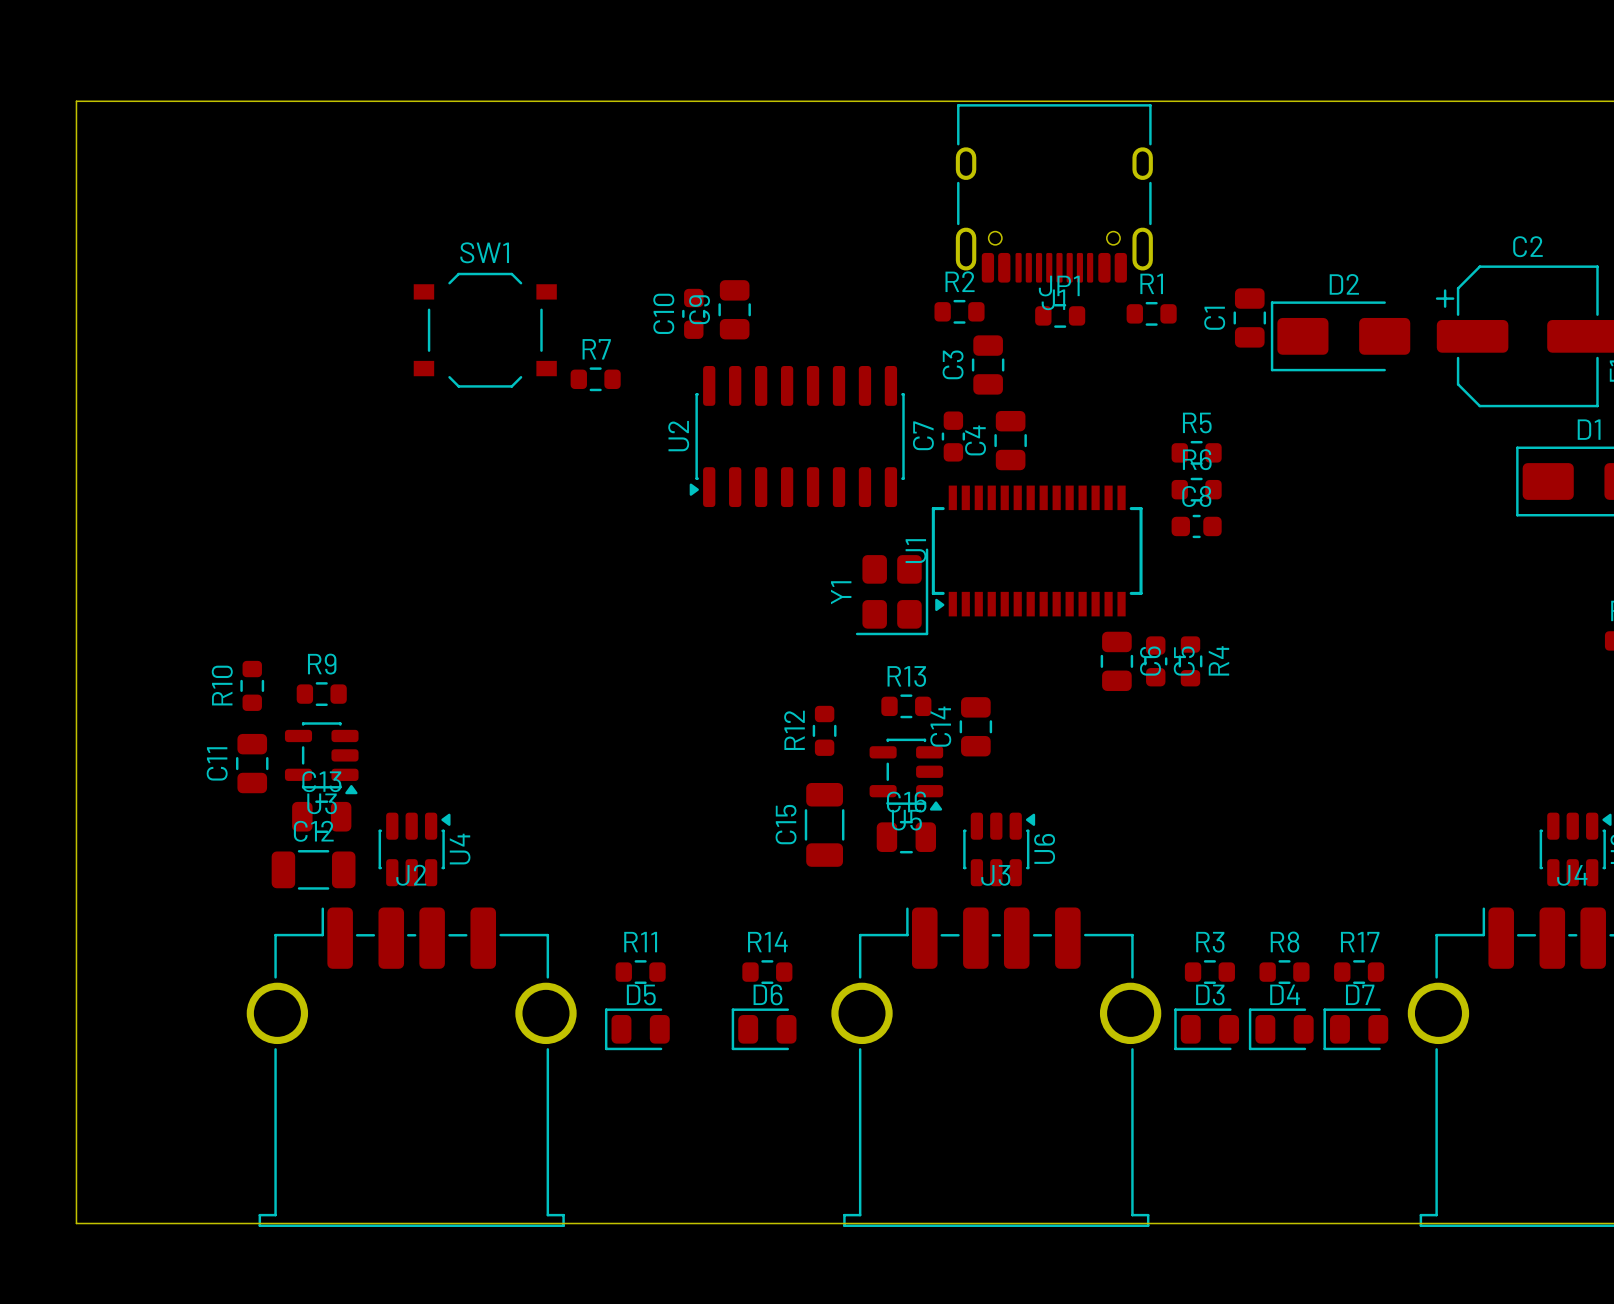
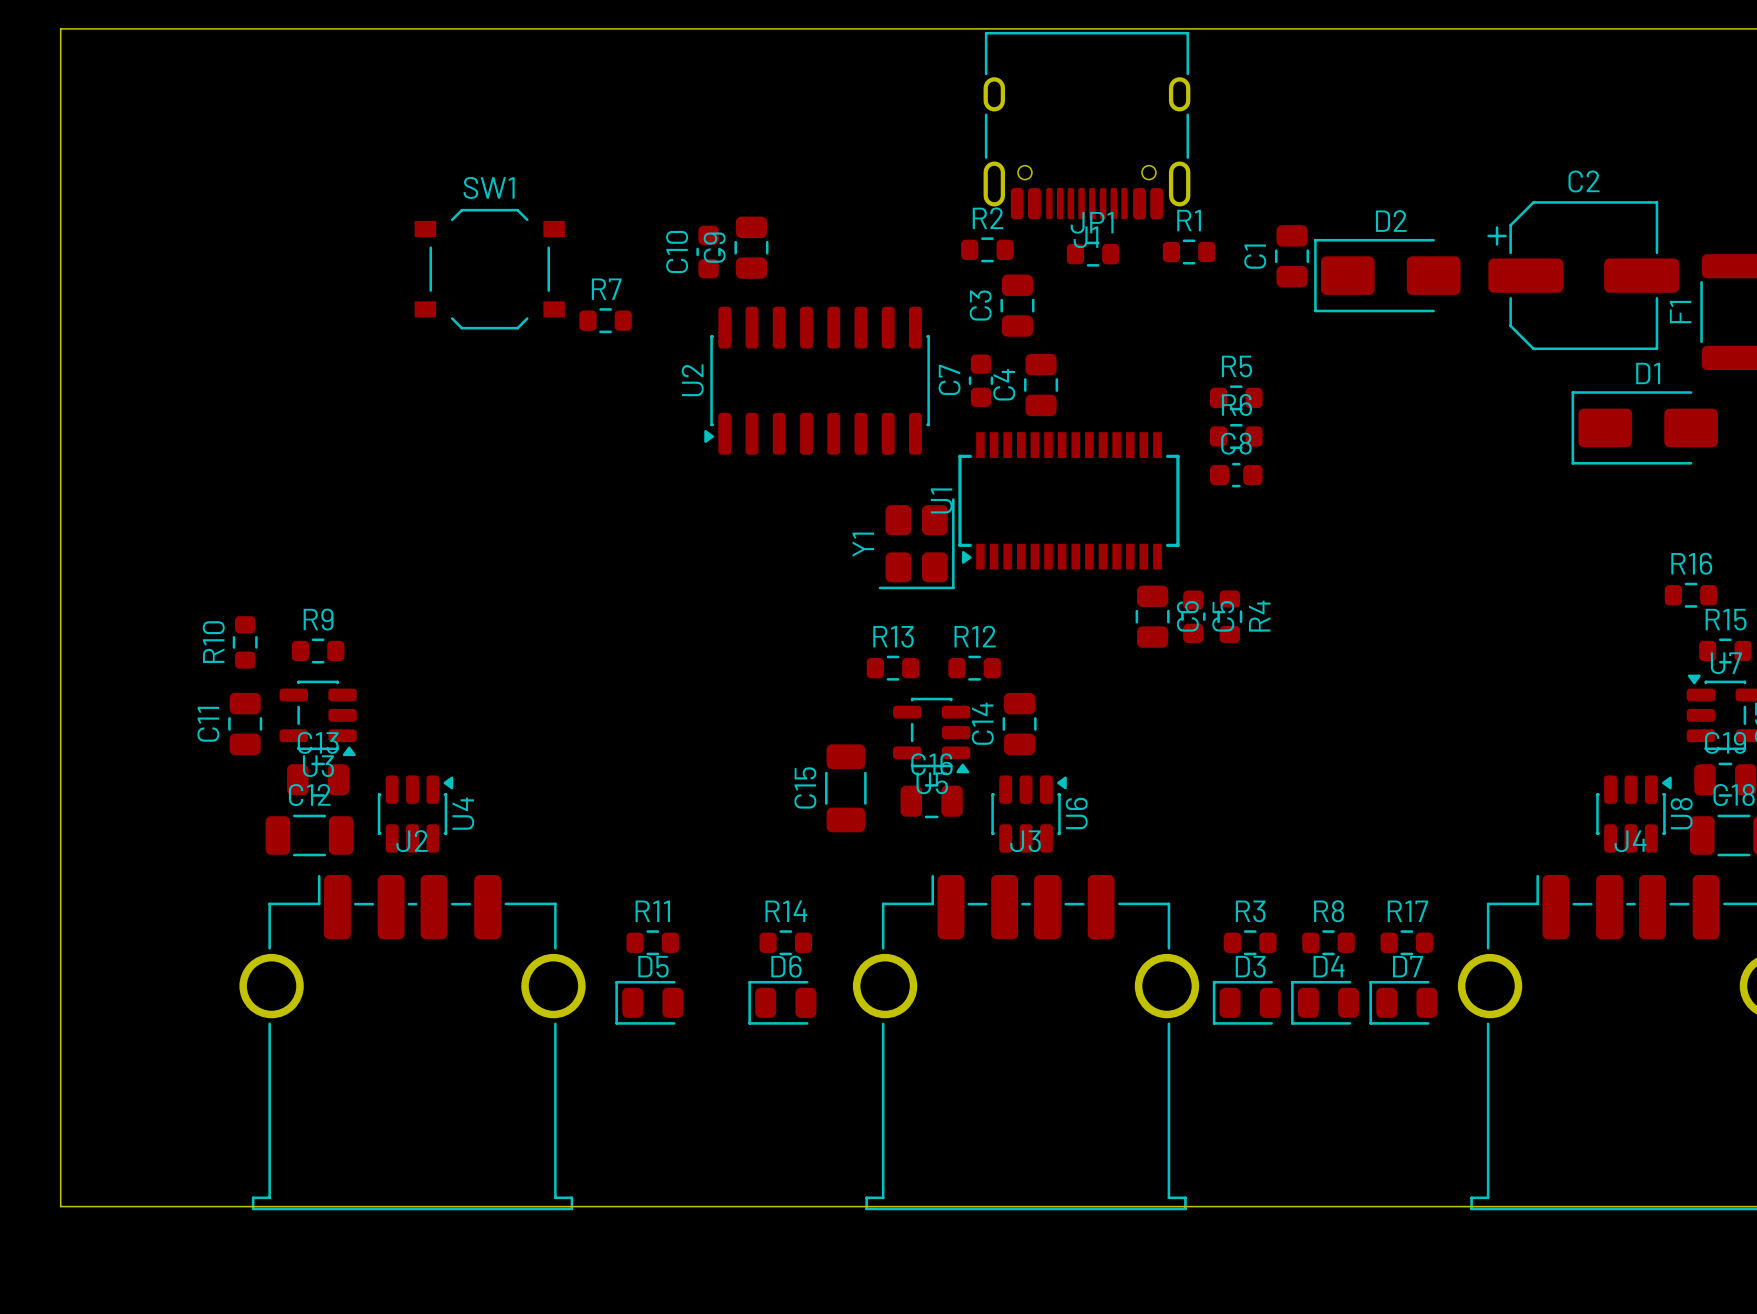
R13 position: (906, 706) -> (893, 668)
C14 position: (975, 726) -> (1019, 723)
R12 rotation: 0° (824, 730) -> 90° clockwise (974, 668)
R12 position: (824, 730) -> (974, 668)

